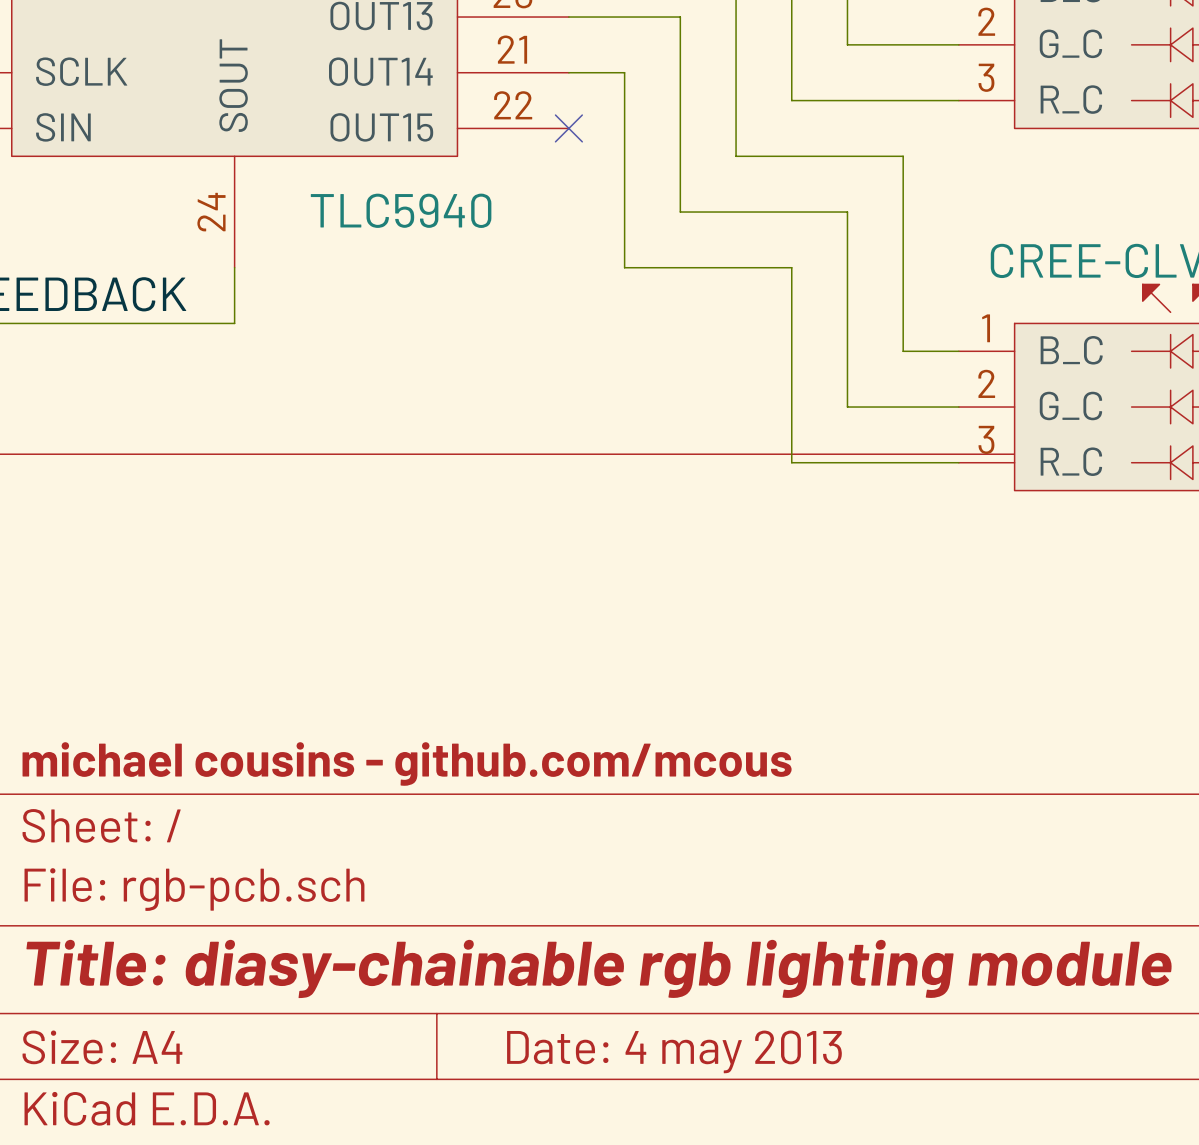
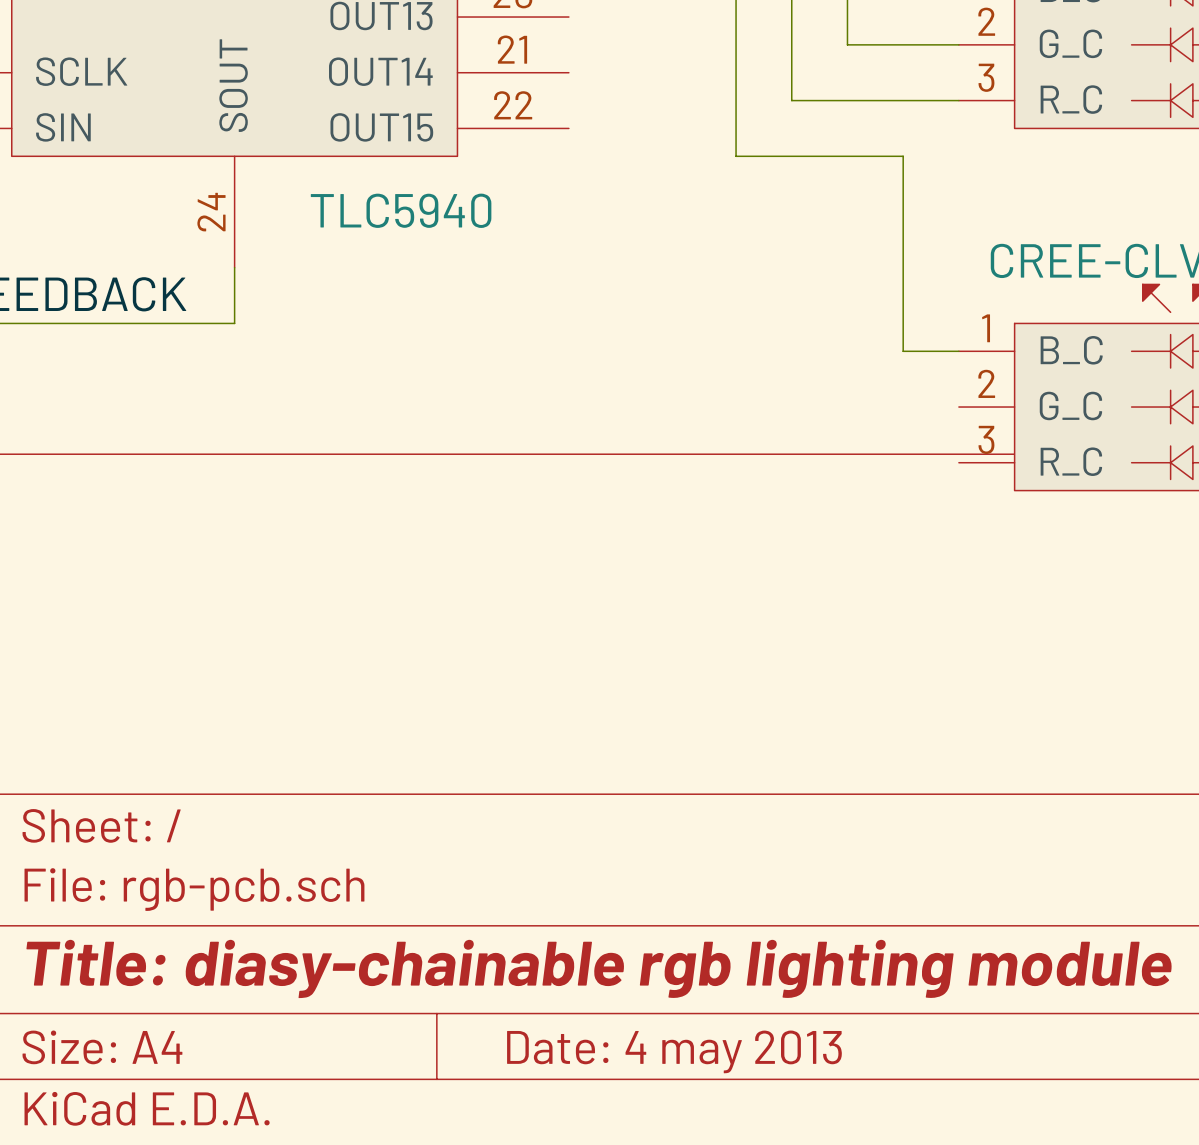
wire: (568, 17) (680, 17) (680, 212) (847, 212) (847, 407) (958, 407) -> none
wire: (568, 72) (624, 72) (624, 267) (791, 267) (791, 462) (958, 462) -> none
no-connect mark: (568, 128) -> none
title block: michael cousins - github.com/mcous (407, 764) -> none

